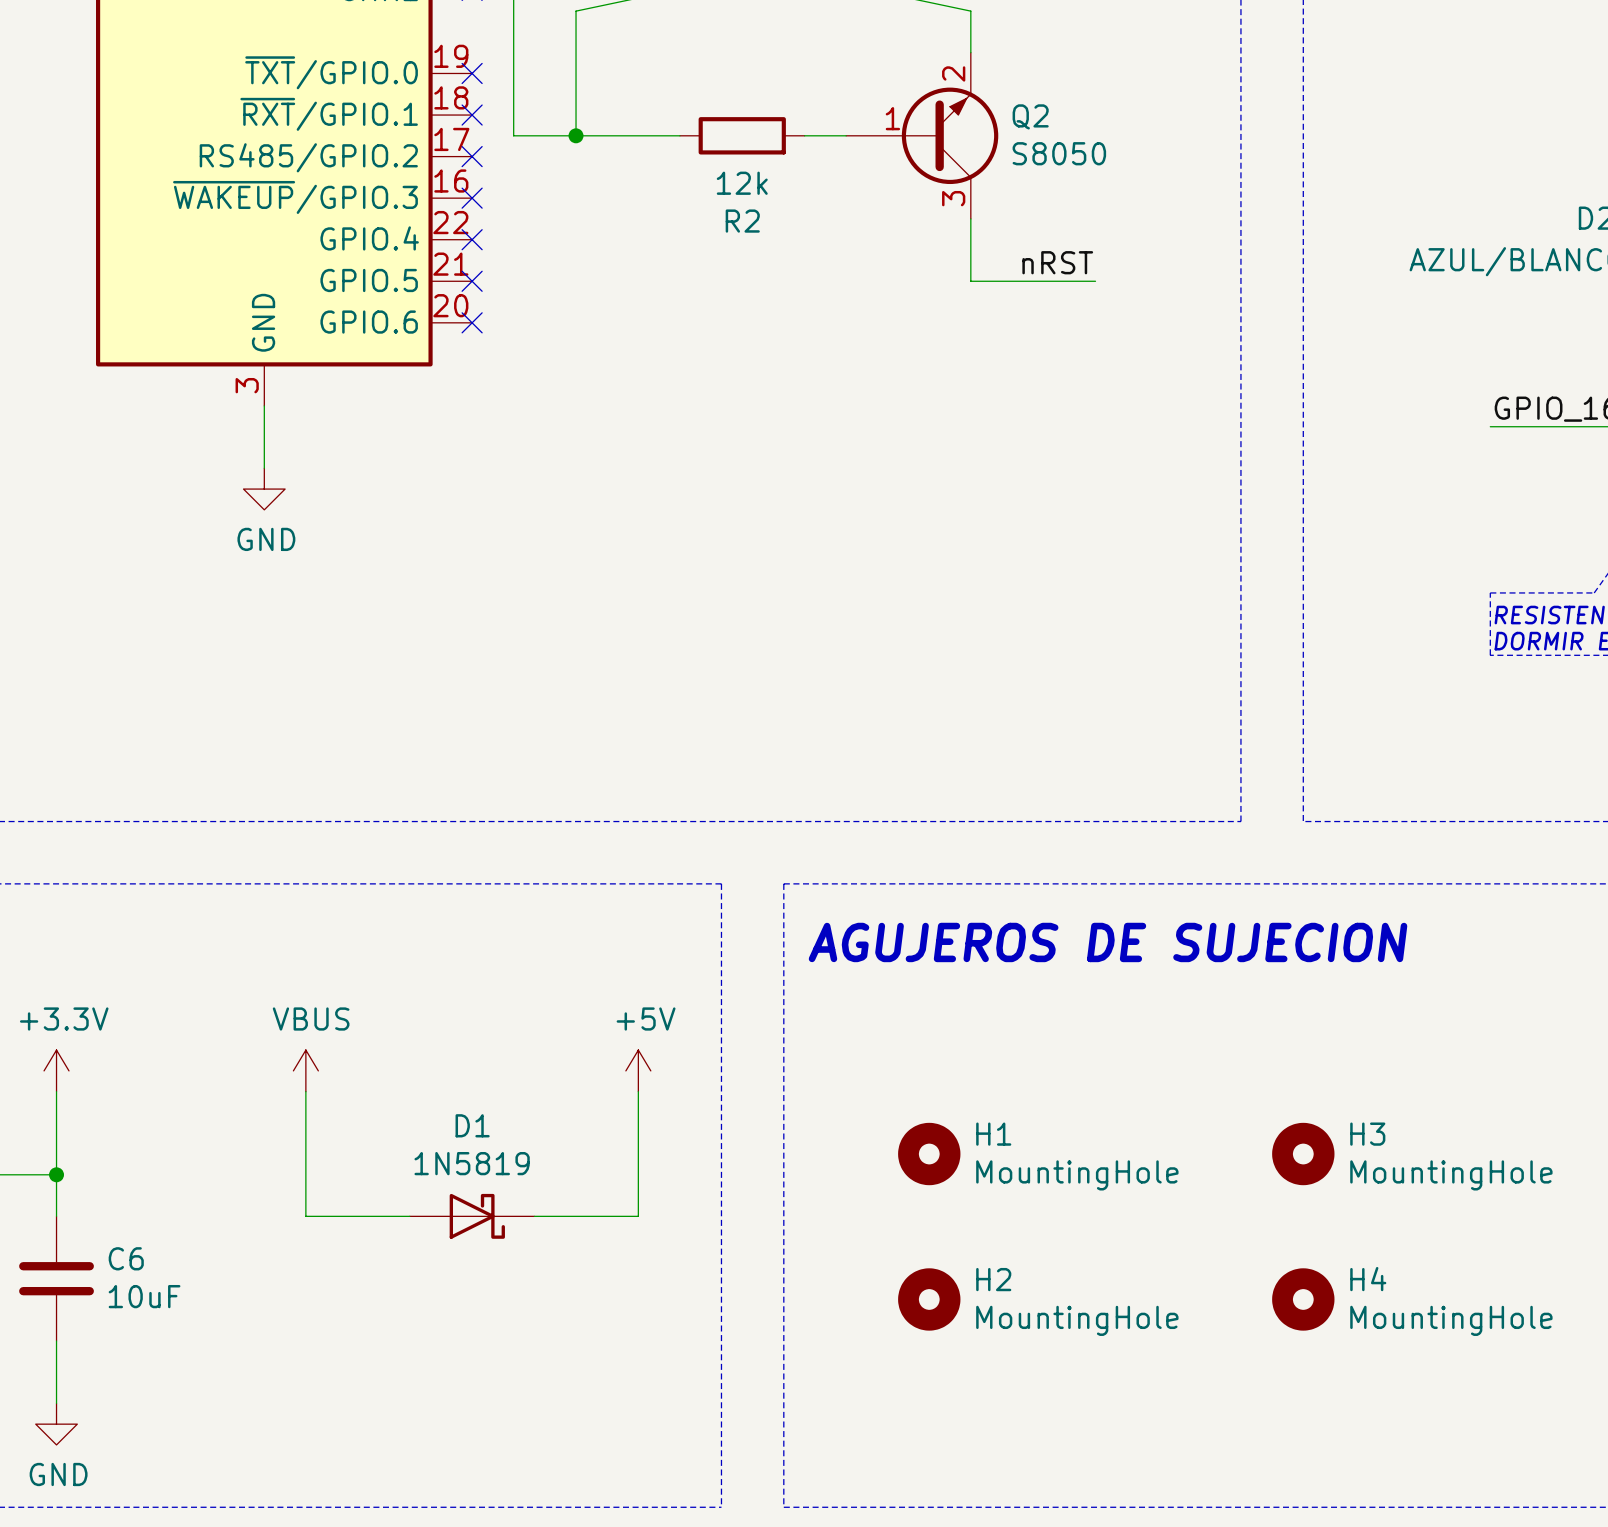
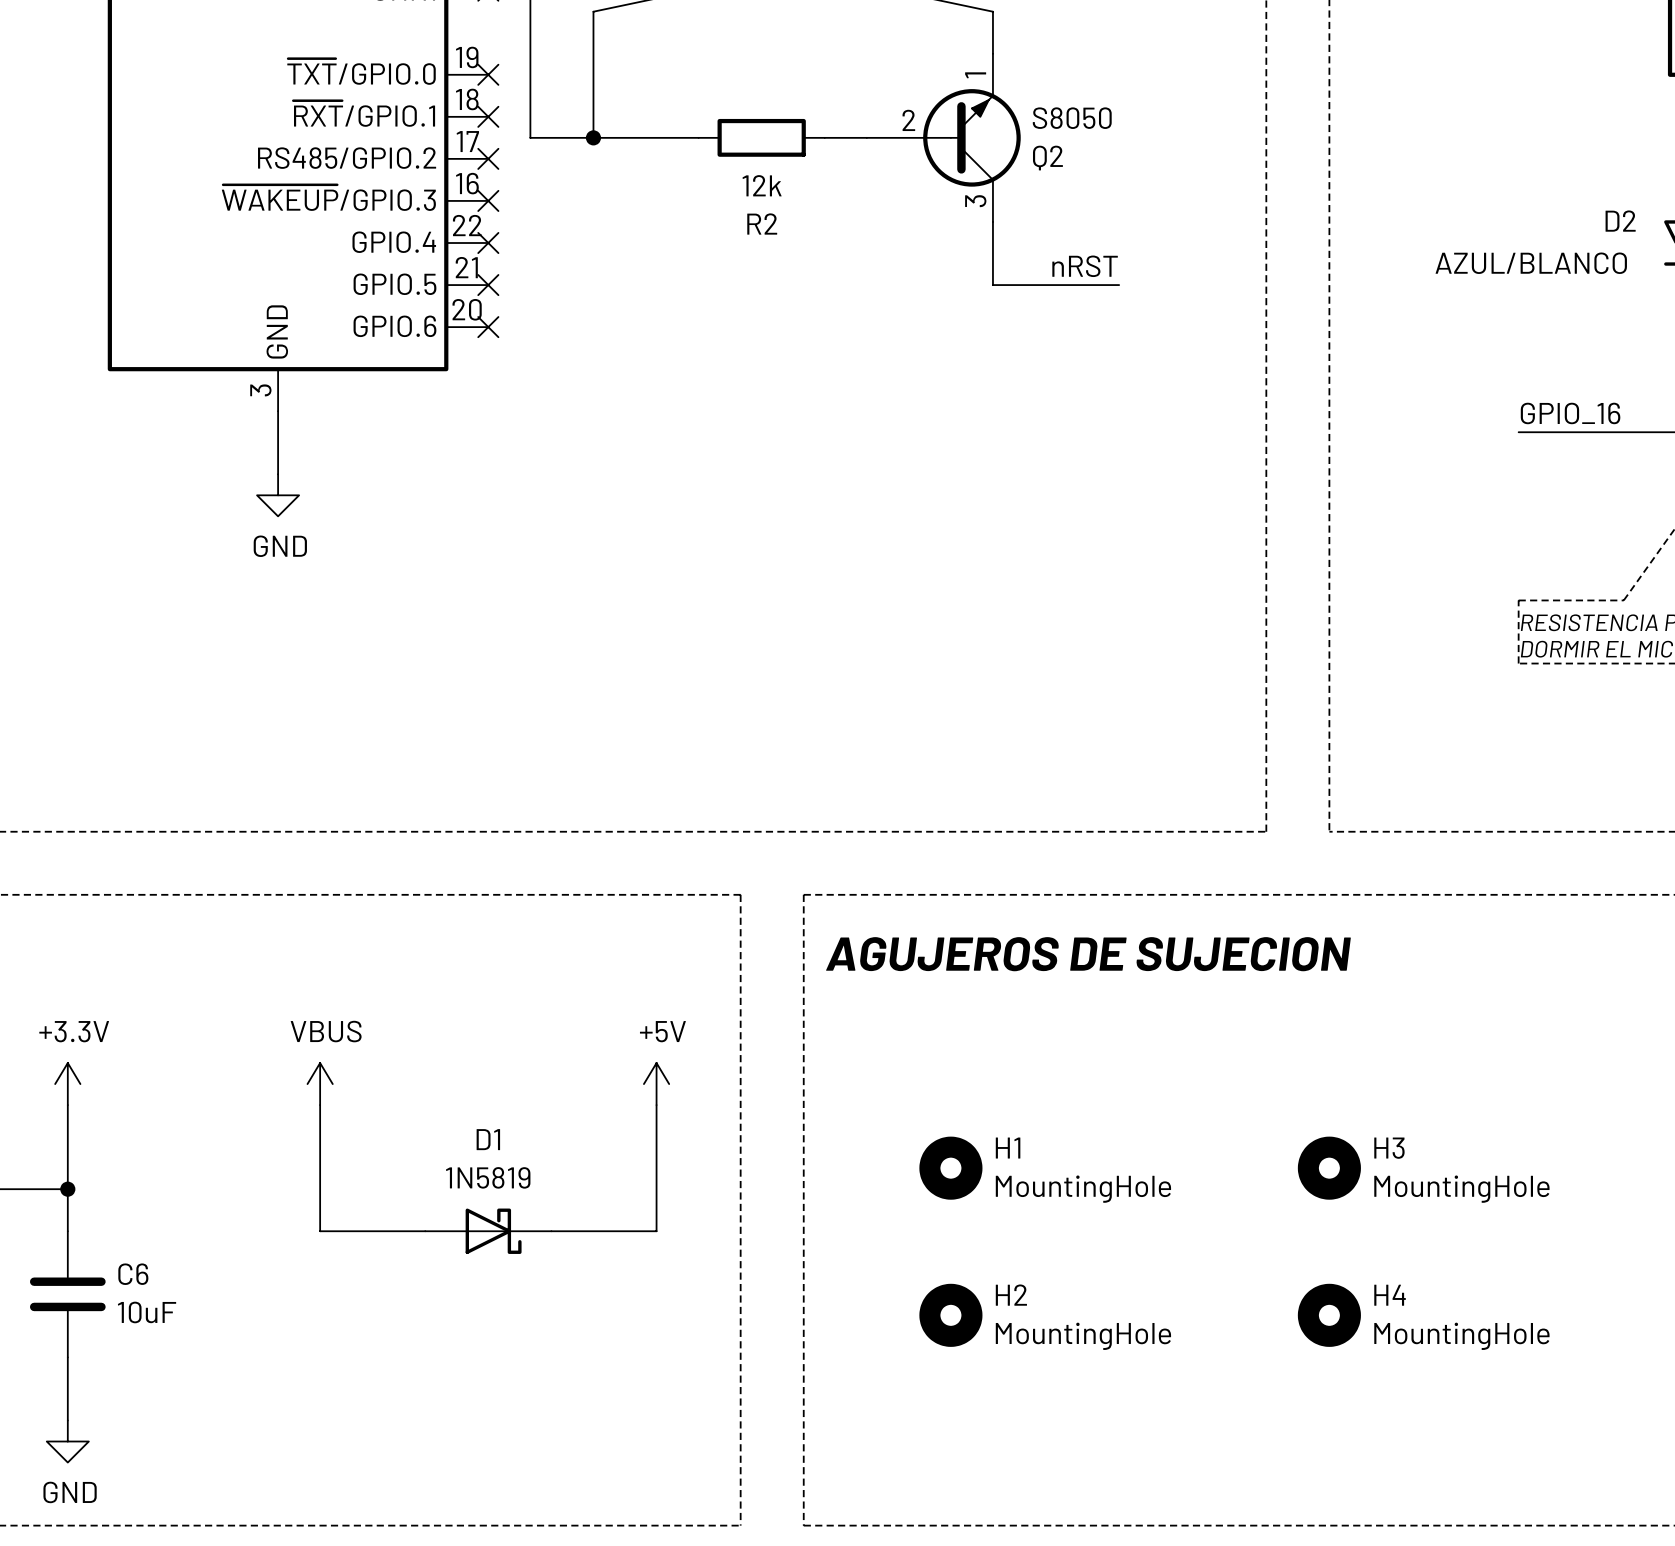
Q2 symbol: [846, 52, 999, 219] -> [866, 53, 1021, 222]
Q2 name position: Q2 (1030, 116) -> Q2 (1047, 158)
Q2 value position: S8050 (1059, 153) -> S8050 (1072, 118)

